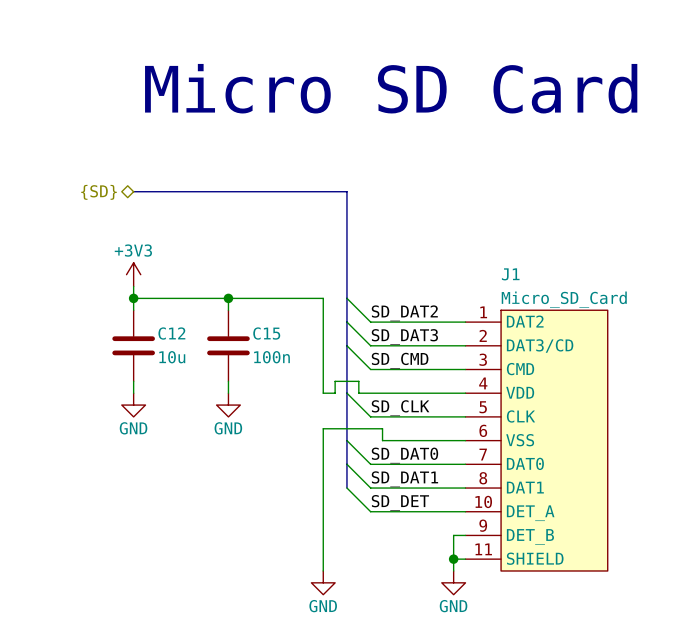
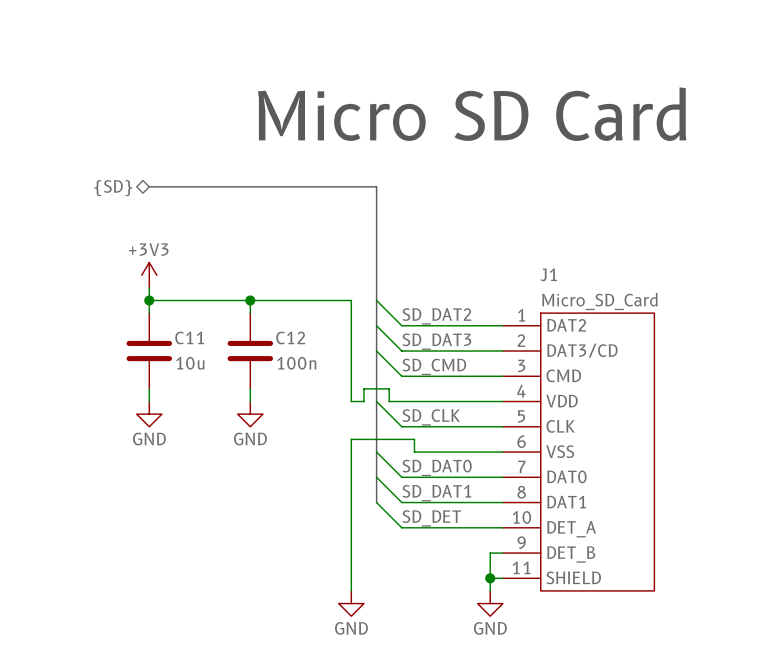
text position: Micro SD Card (391, 88) -> Micro SD Card (472, 114)
C12 name: C12 (171, 333) -> C11 (189, 337)
C15 name: C15 (266, 333) -> C12 (290, 337)

